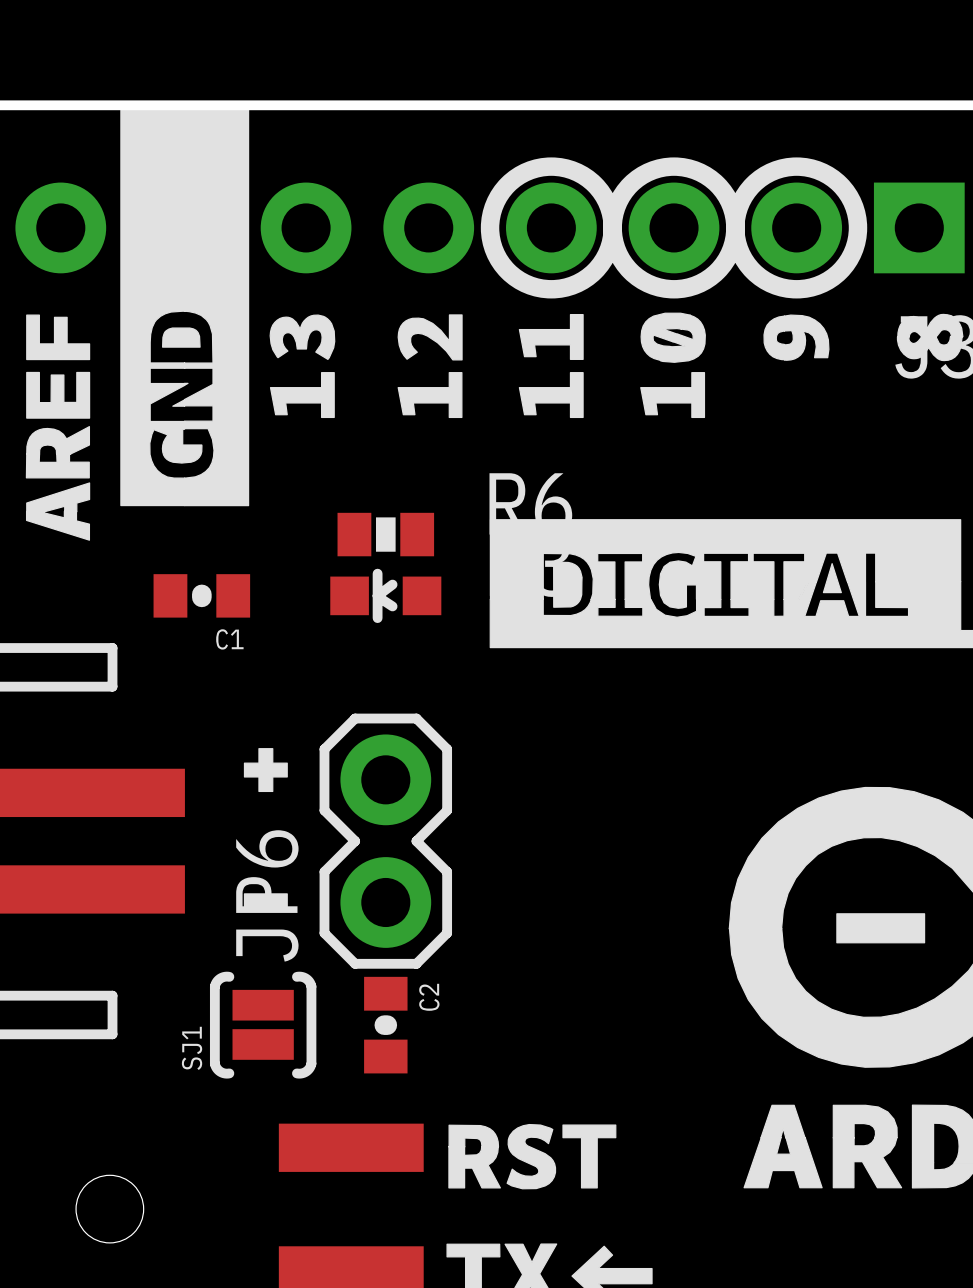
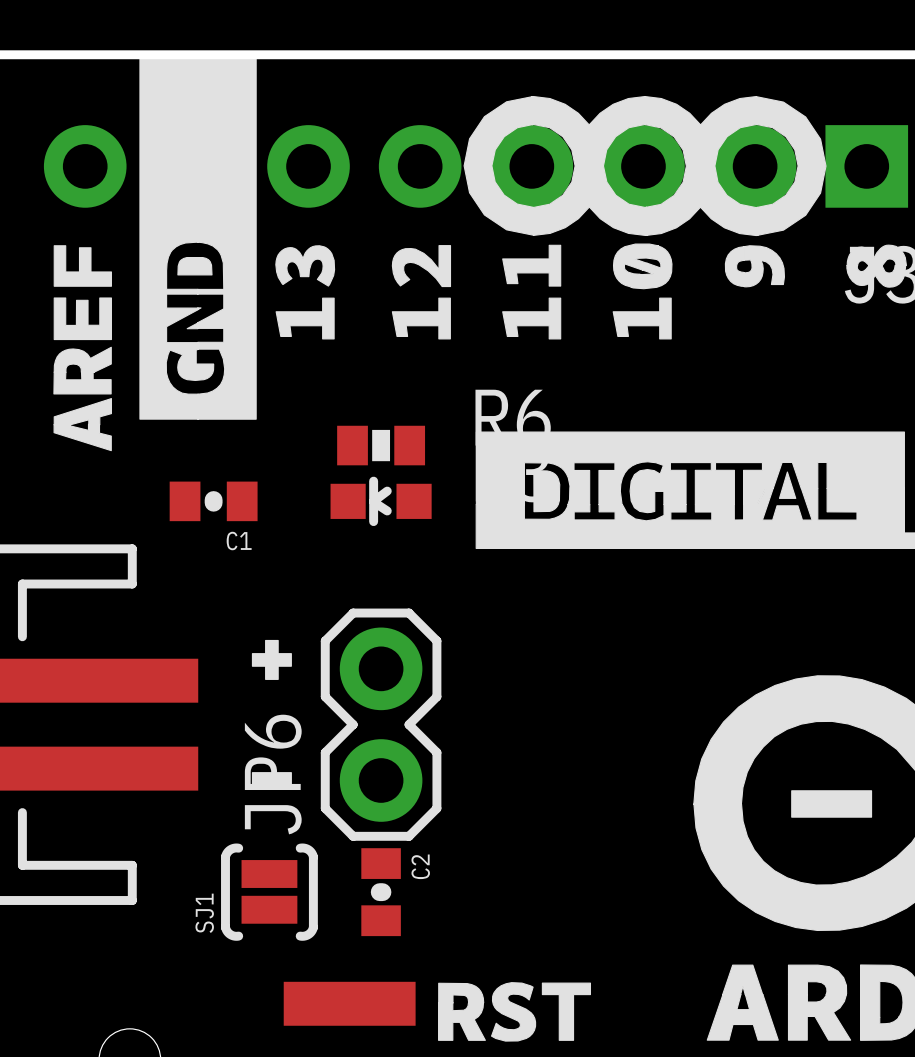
drawing: none -> [463, 95, 827, 237]
drawing: [480, 157, 868, 299] -> none

